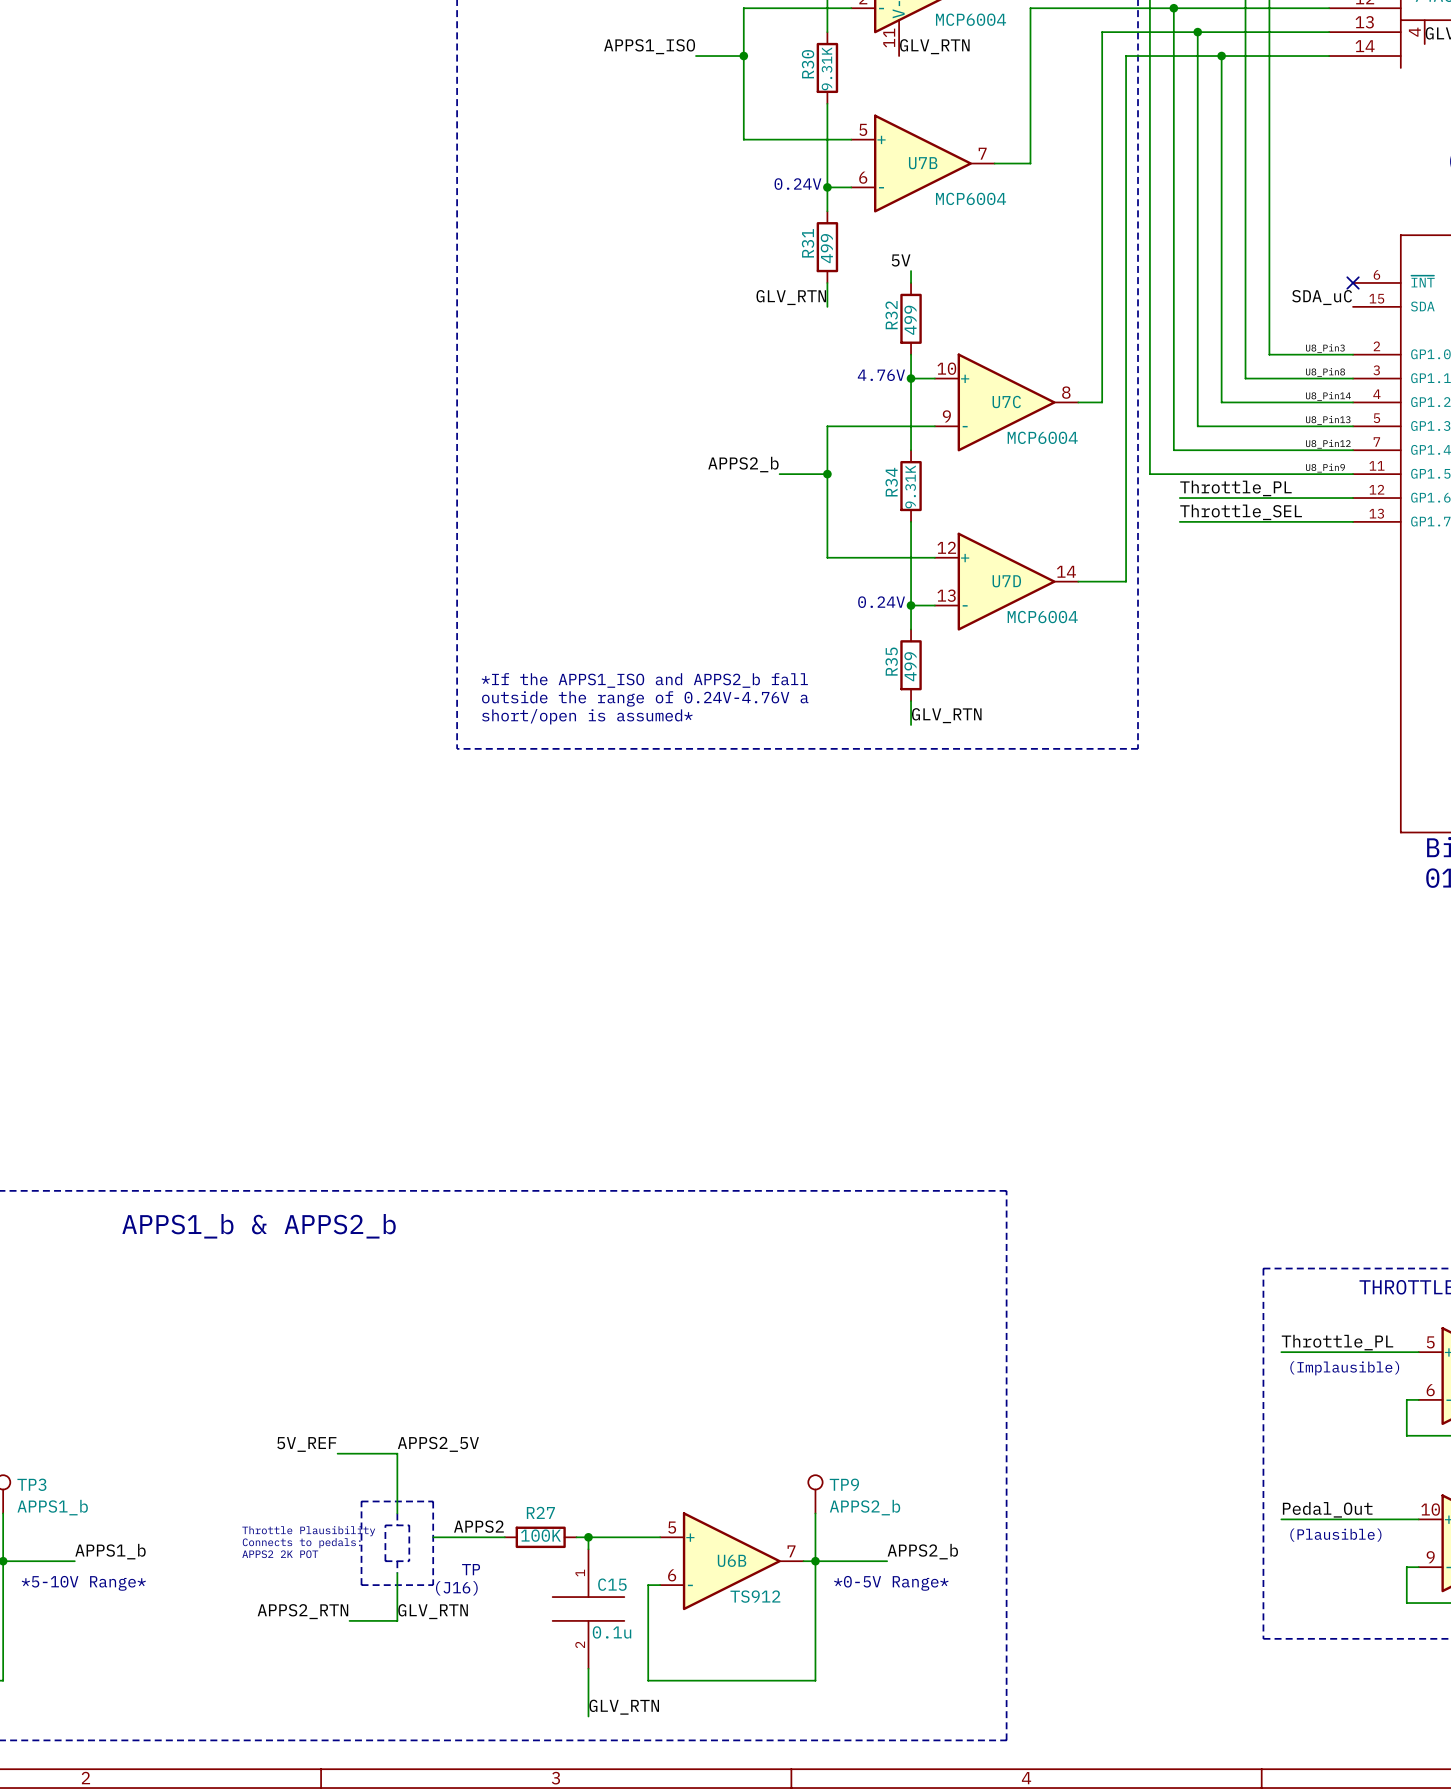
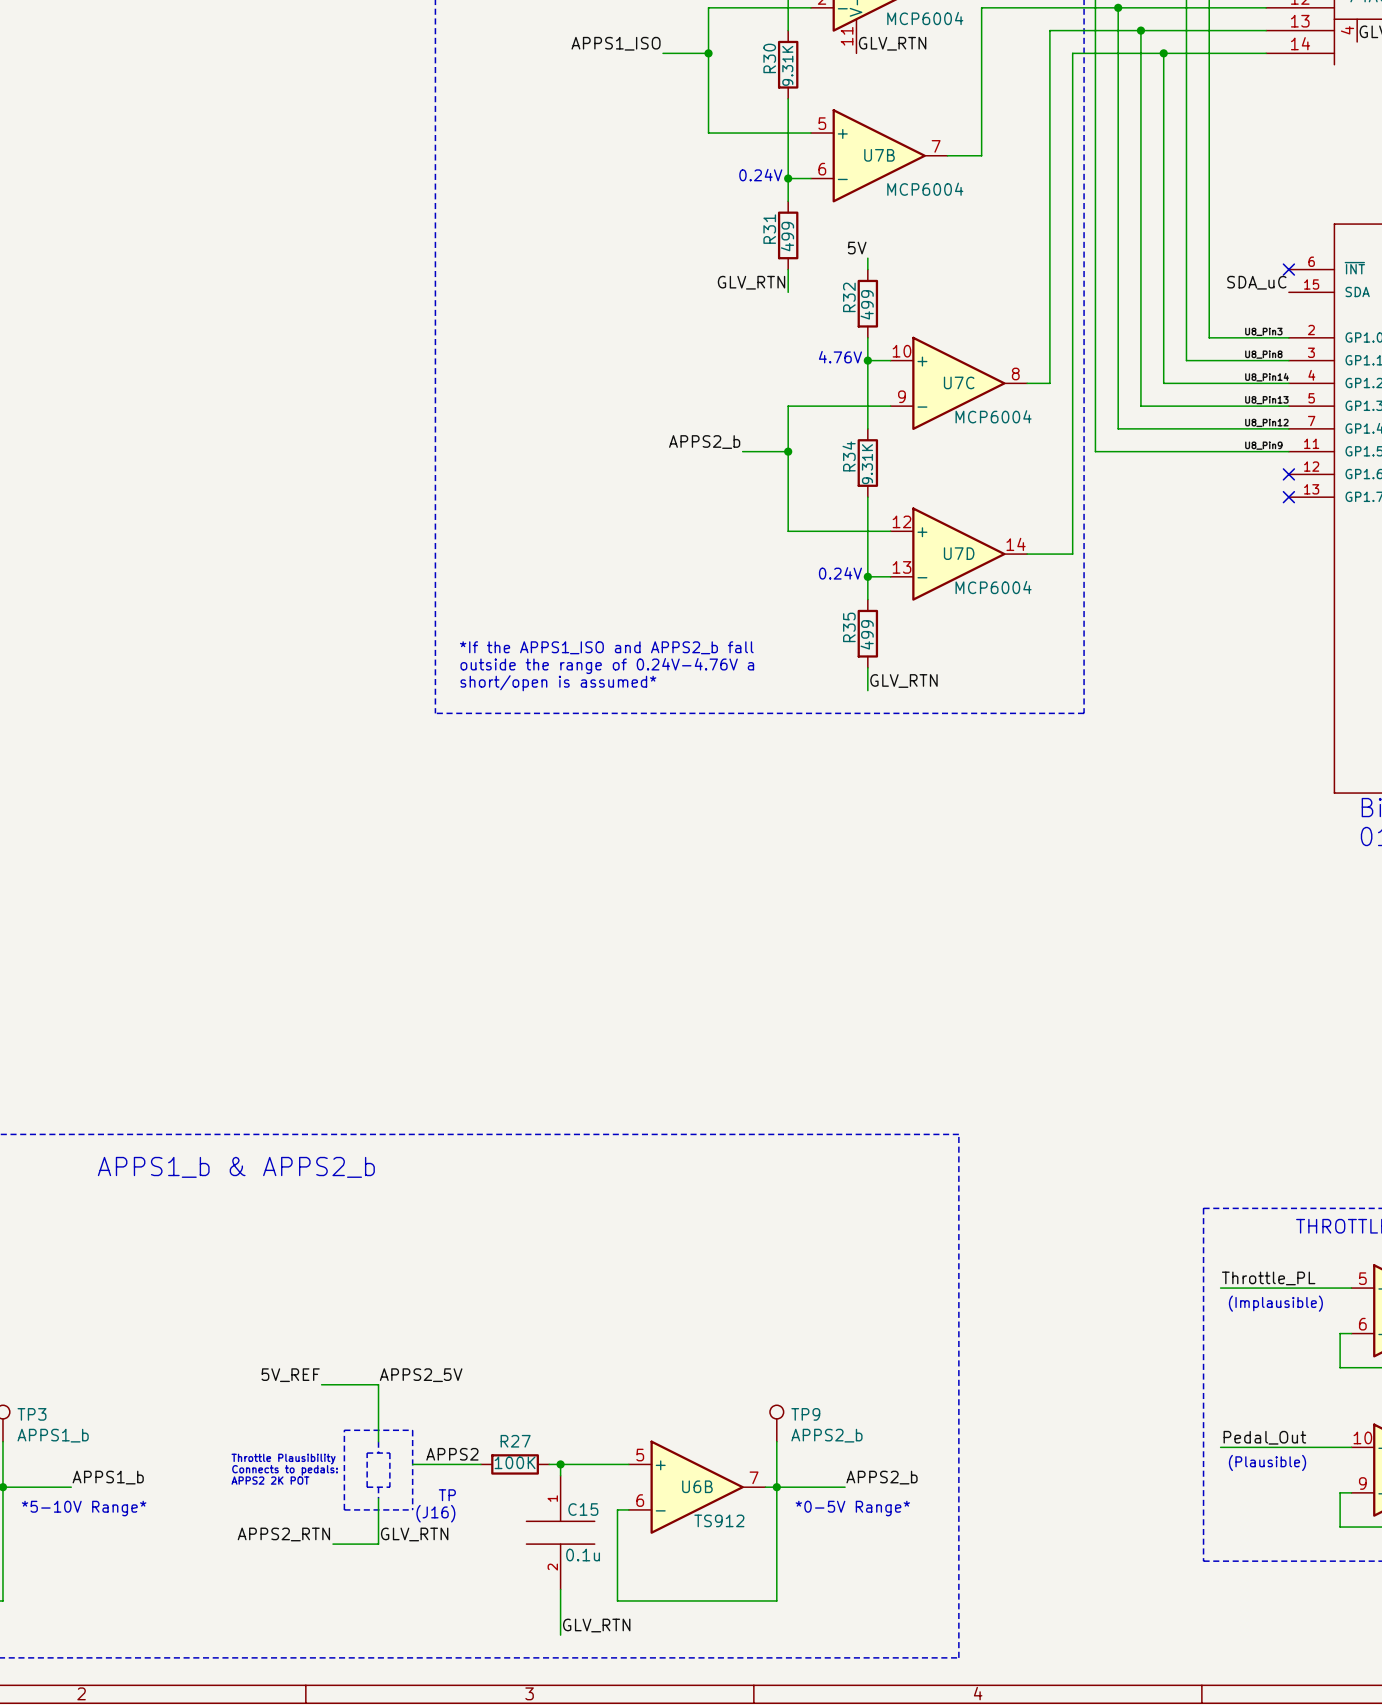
label: Throttle_PL (1235, 488) -> none
wire: (1179, 498) (1353, 498) -> none
no-connect mark: none -> (1288, 474)
label: Throttle_SEL (1241, 512) -> none
wire: (1179, 521) (1353, 521) -> none
no-connect mark: none -> (1288, 497)

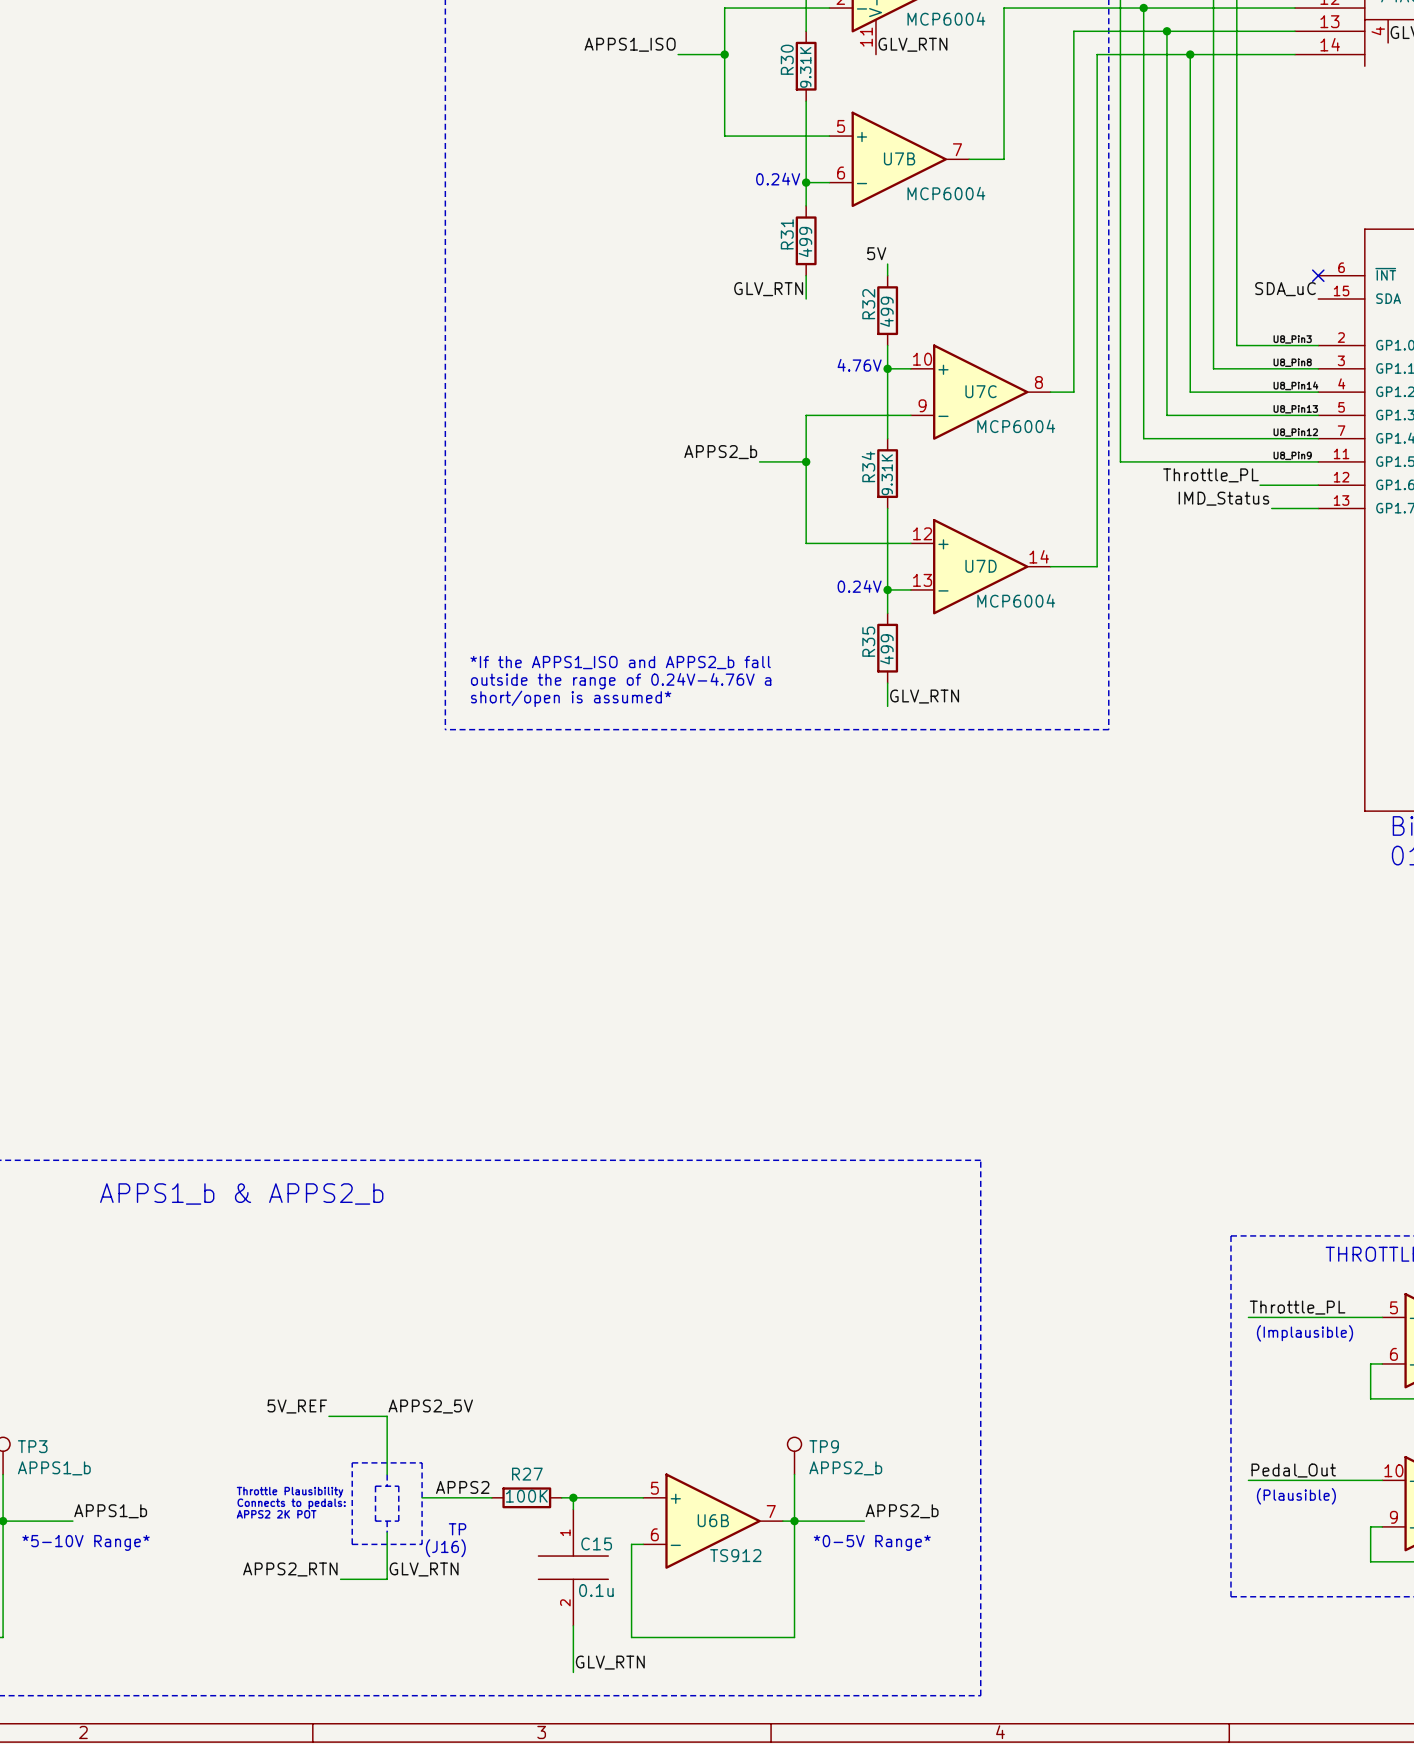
label: none -> Throttle_PL (1210, 475)
wire: none -> (1260, 485) (1318, 485)
no-connect mark: (1288, 474) -> none
label: none -> IMD_Status (1223, 498)
wire: none -> (1271, 508) (1318, 508)
no-connect mark: (1288, 497) -> none

